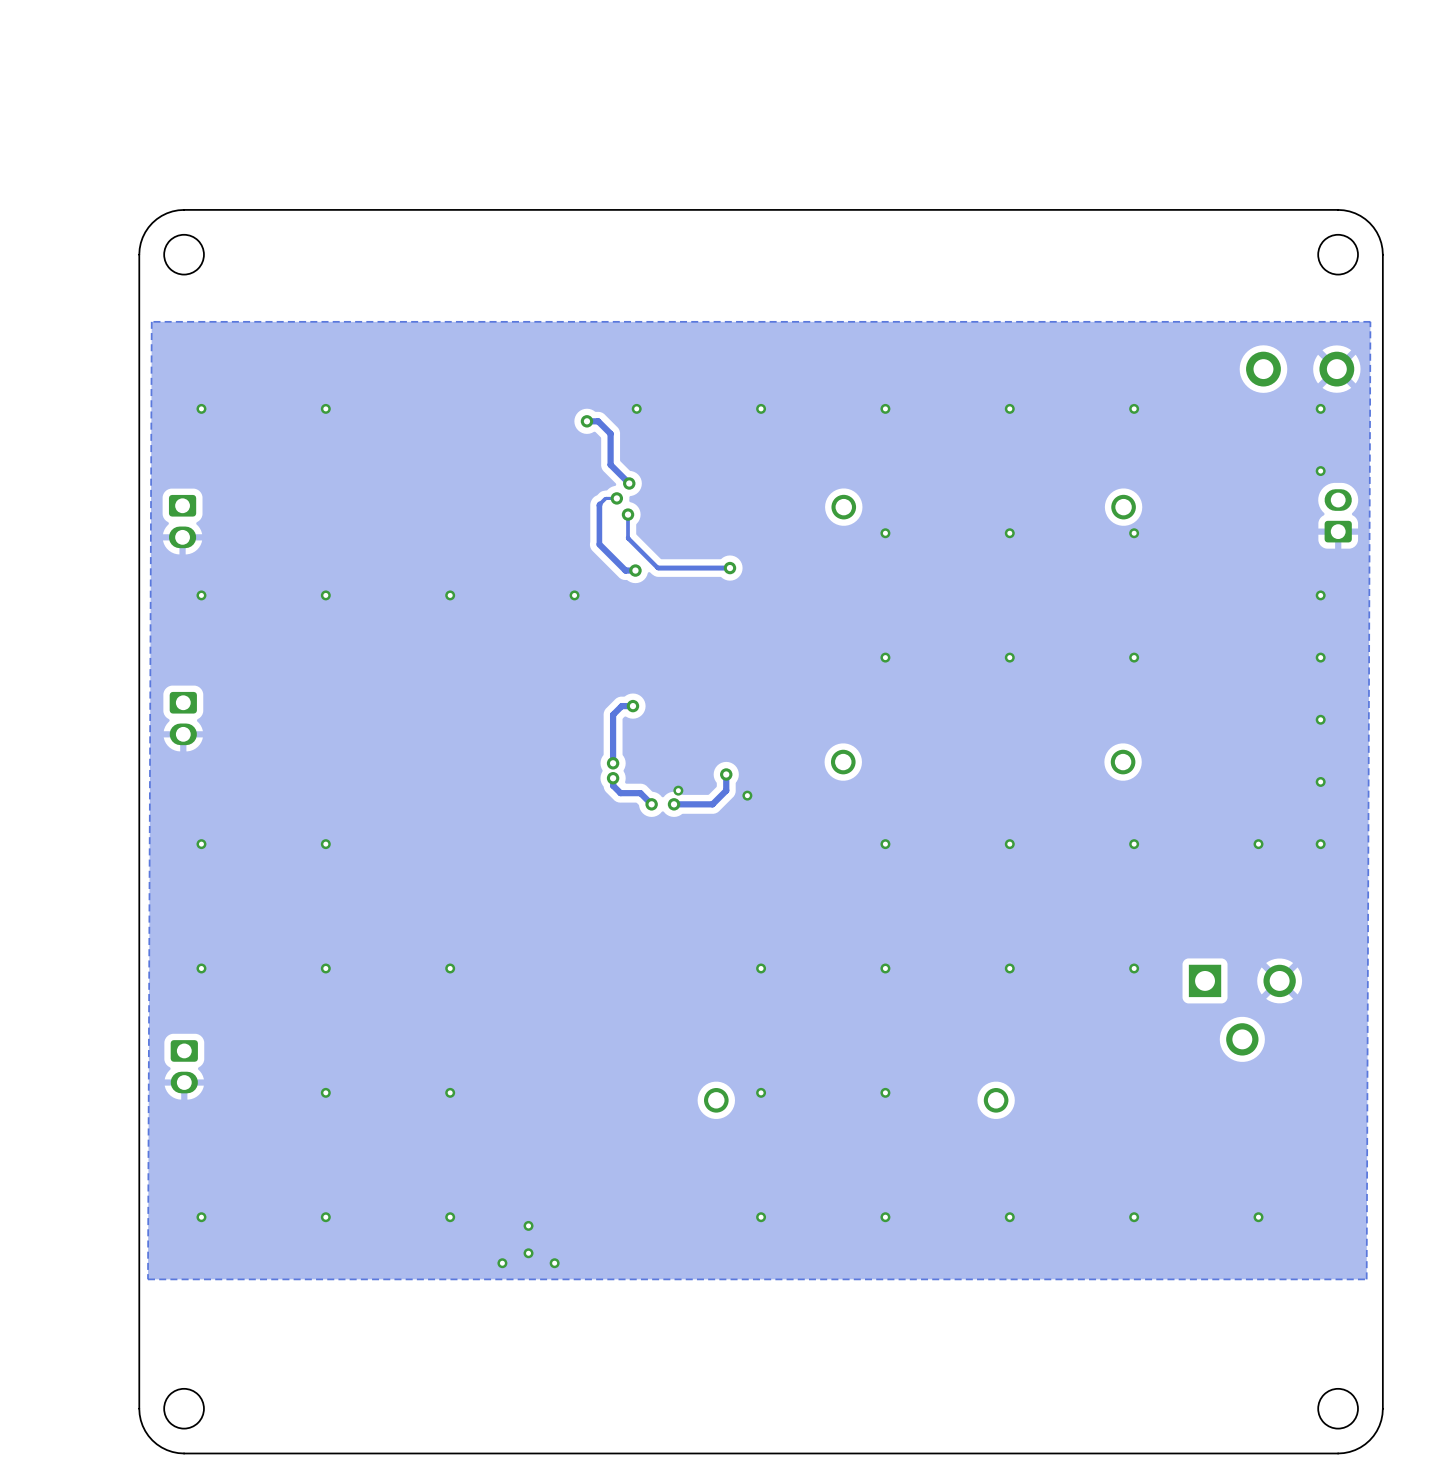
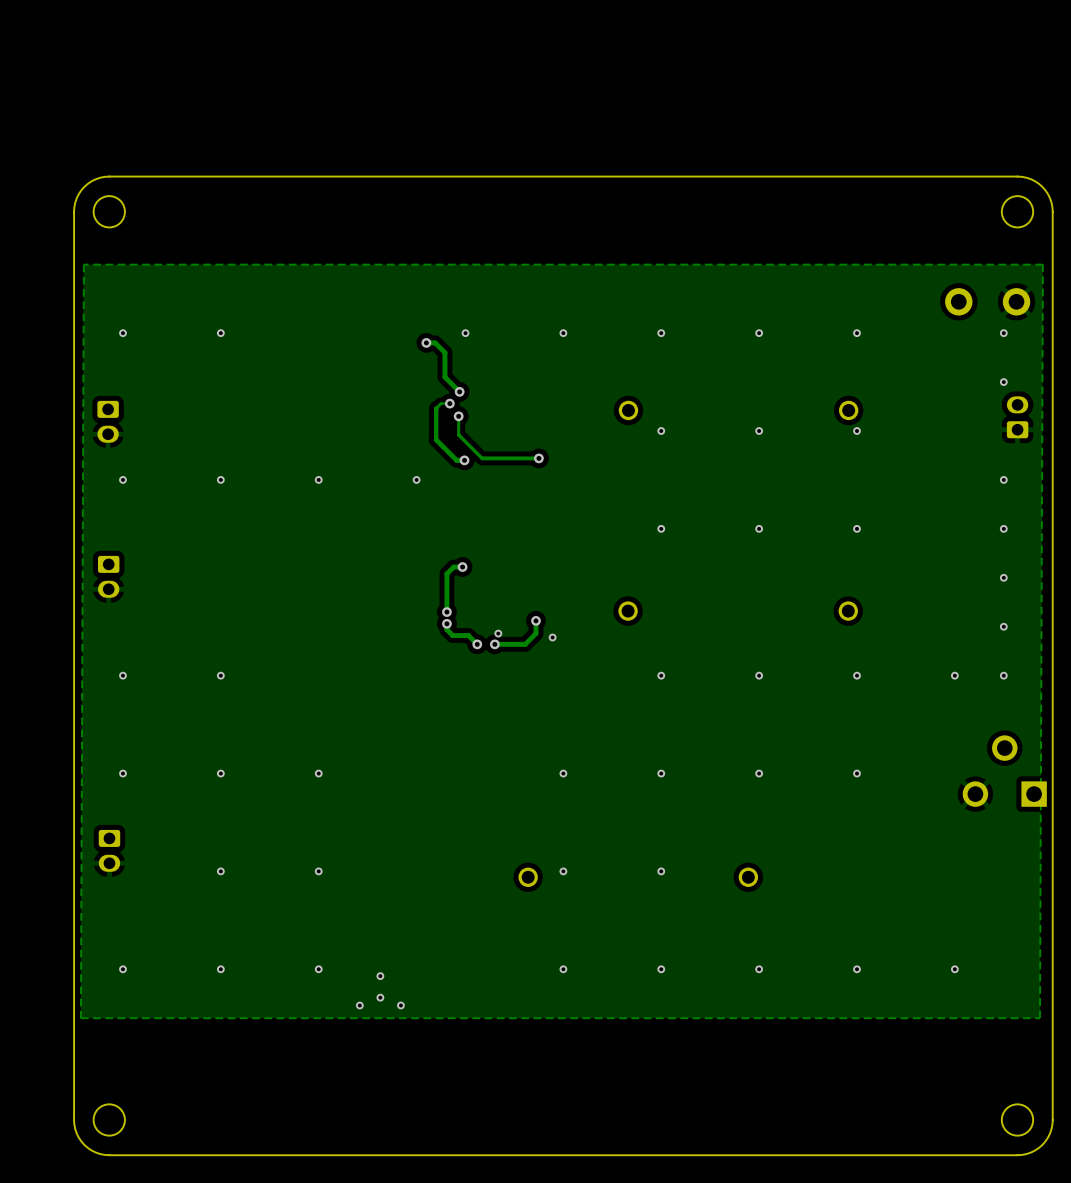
part rotation: 0° (1242, 1010) -> 180° (1004, 771)
part position: (1242, 1010) -> (1004, 771)

